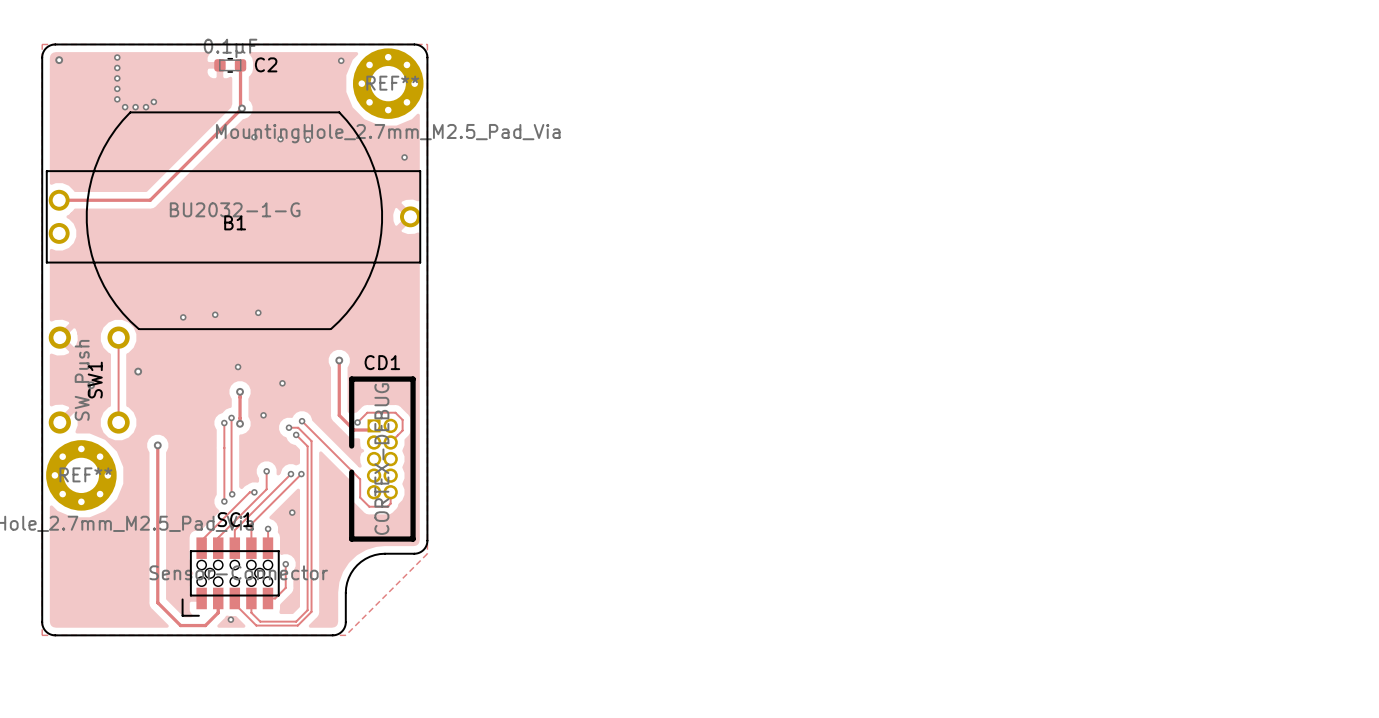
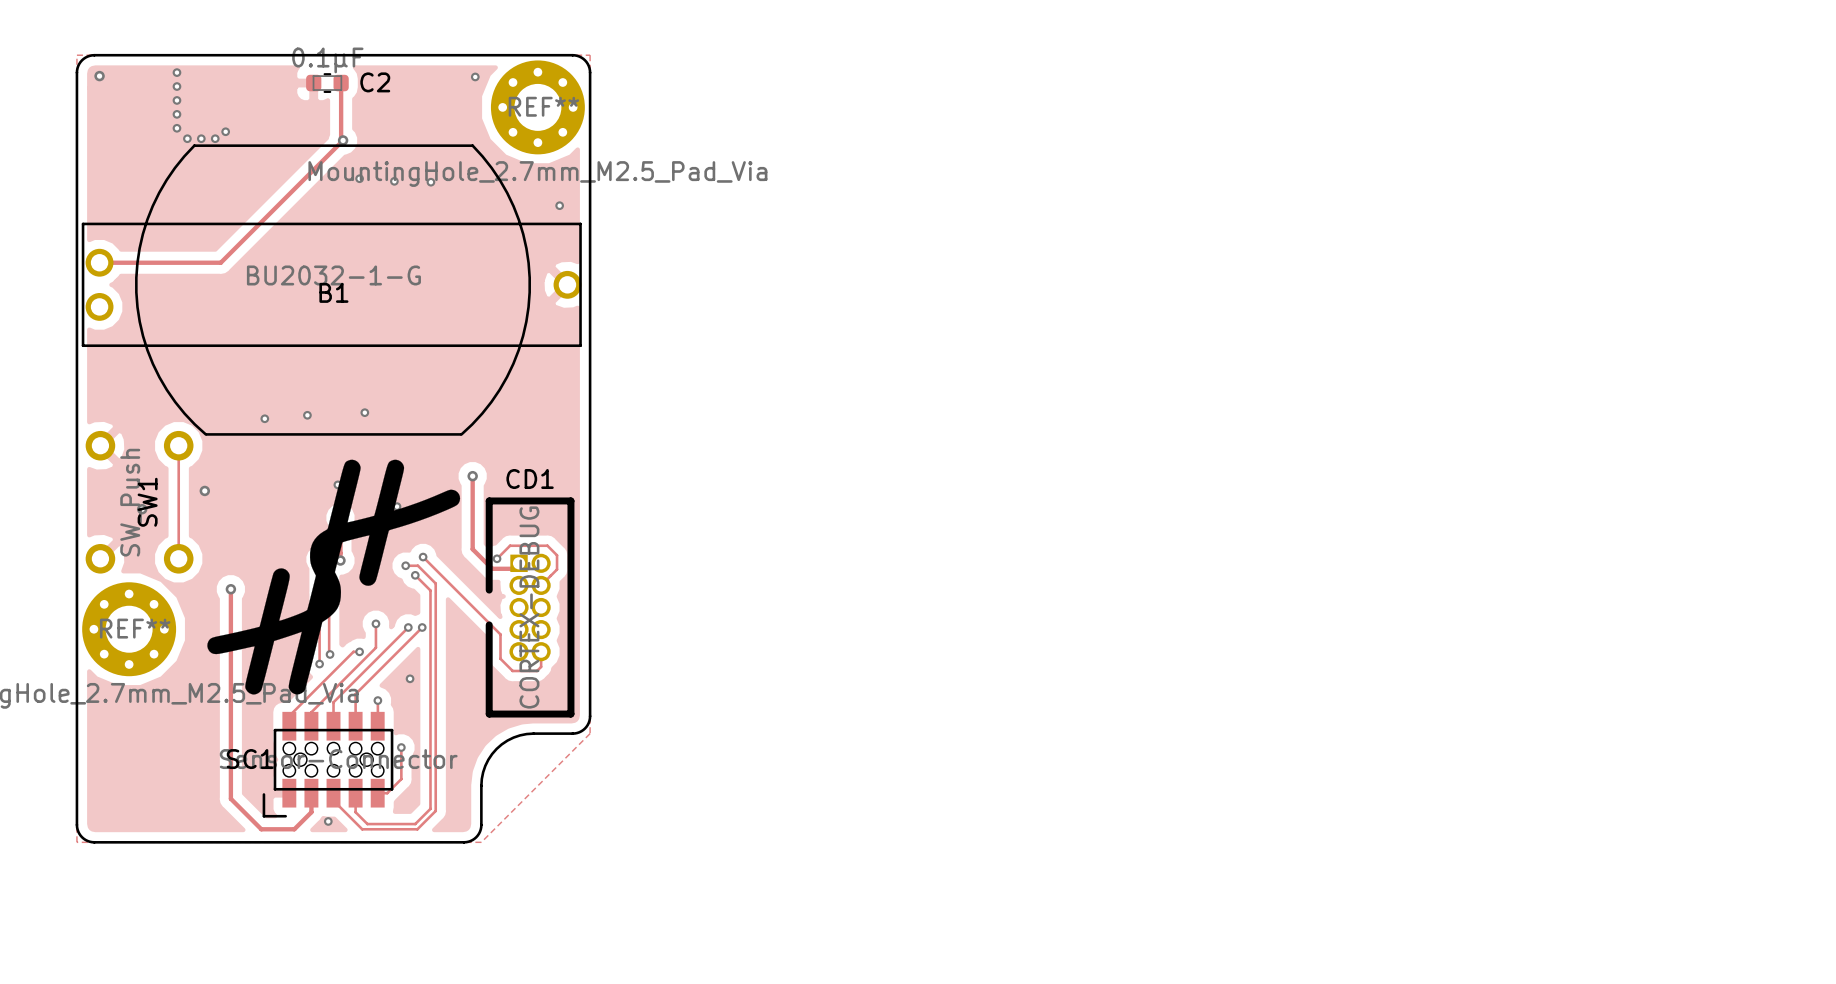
drawing: none -> [207, 459, 461, 695]
SC1 name position: SC1 (235, 519) -> SC1 (250, 759)

